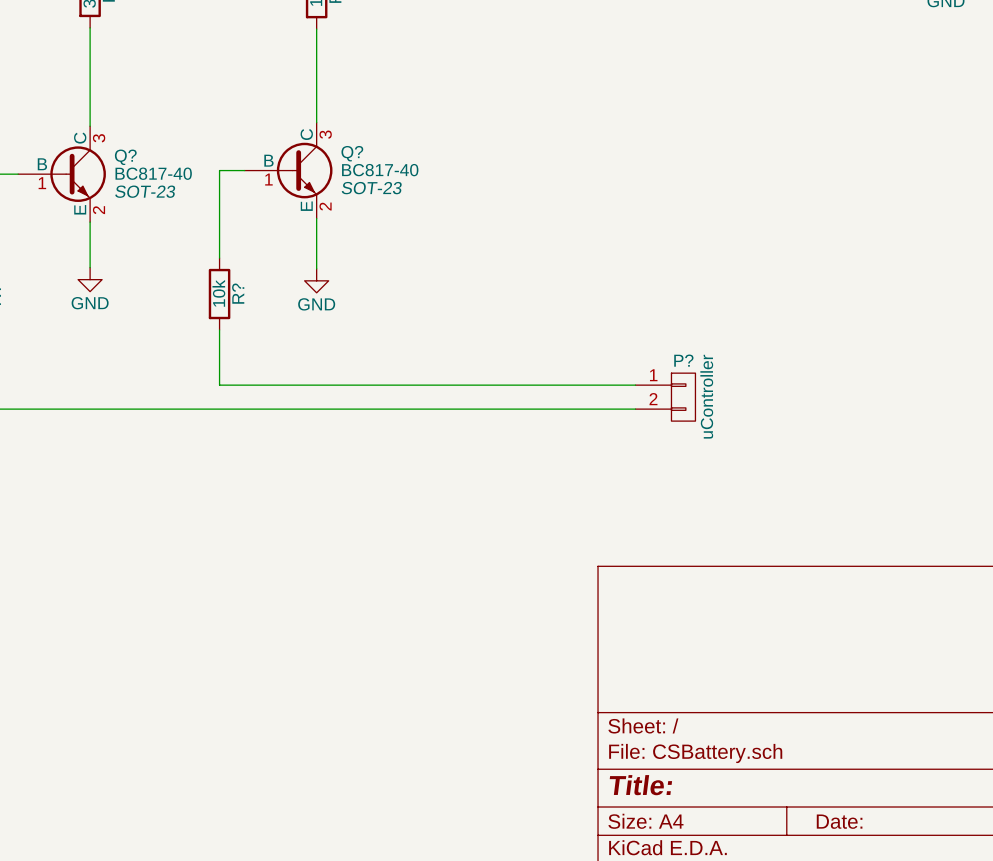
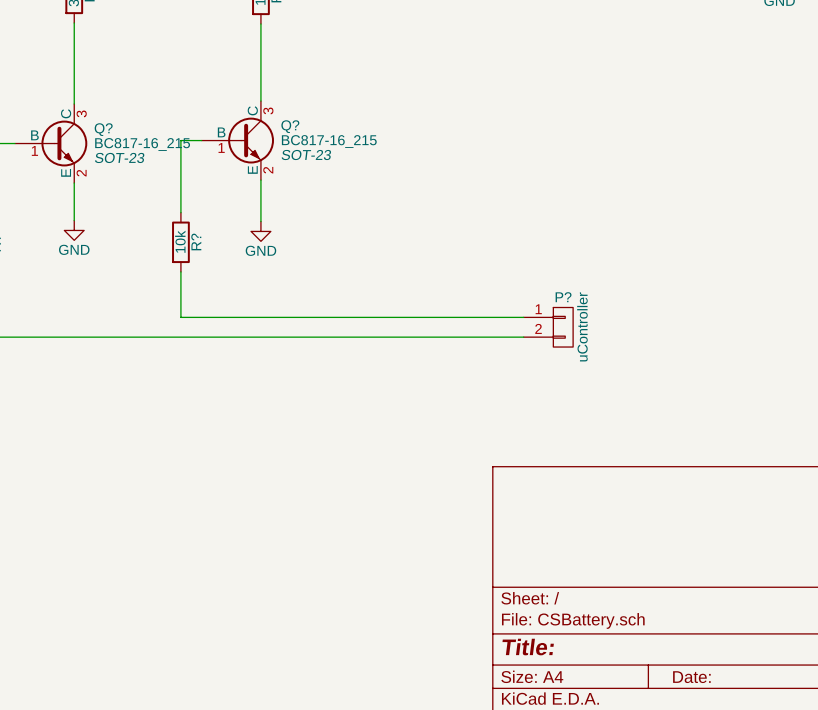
Q? value: BC817-40 (380, 170) -> BC817-16_215 (329, 141)
Q? value: BC817-40 (153, 173) -> BC817-16_215 (142, 144)

